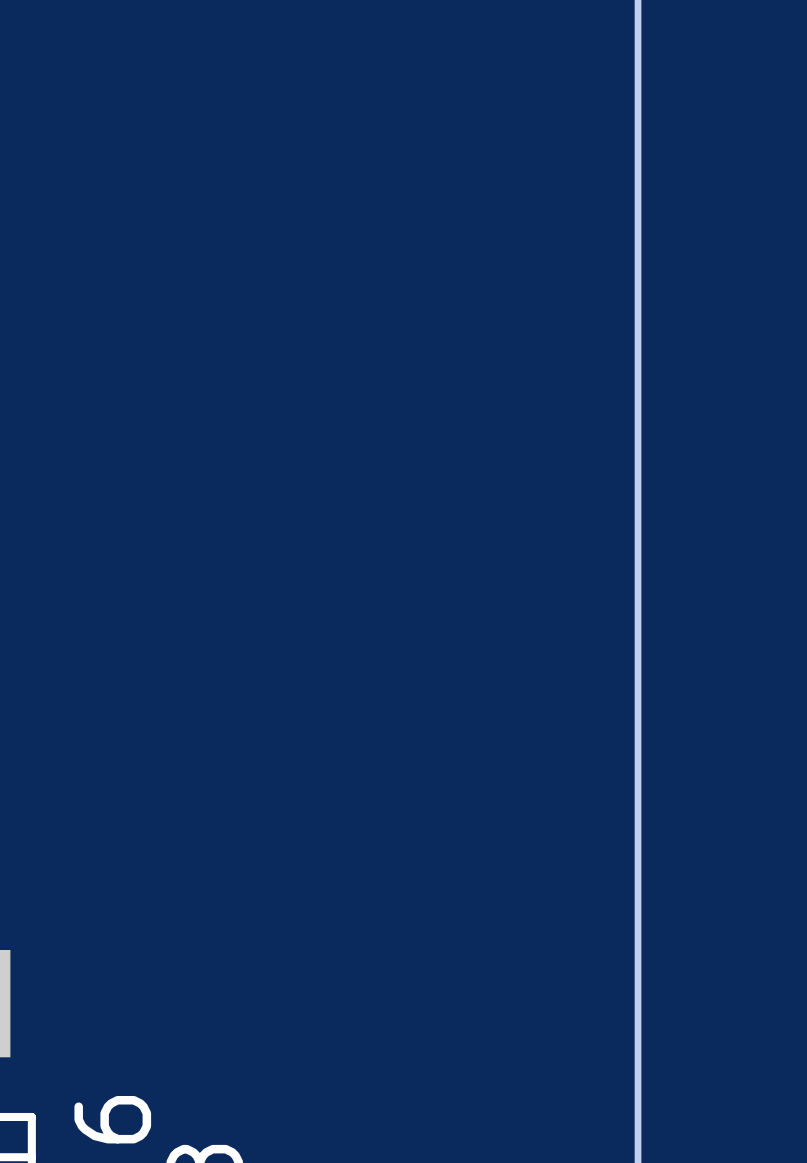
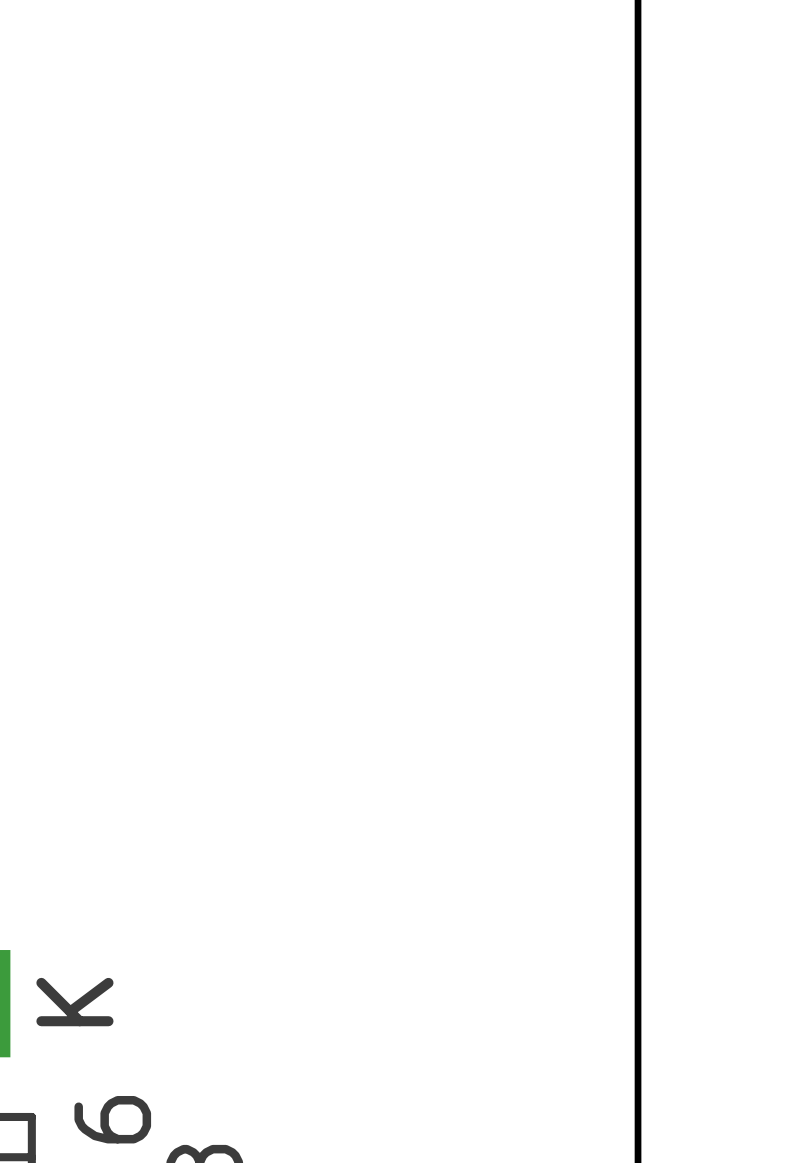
part text: none -> K (74, 1002)

